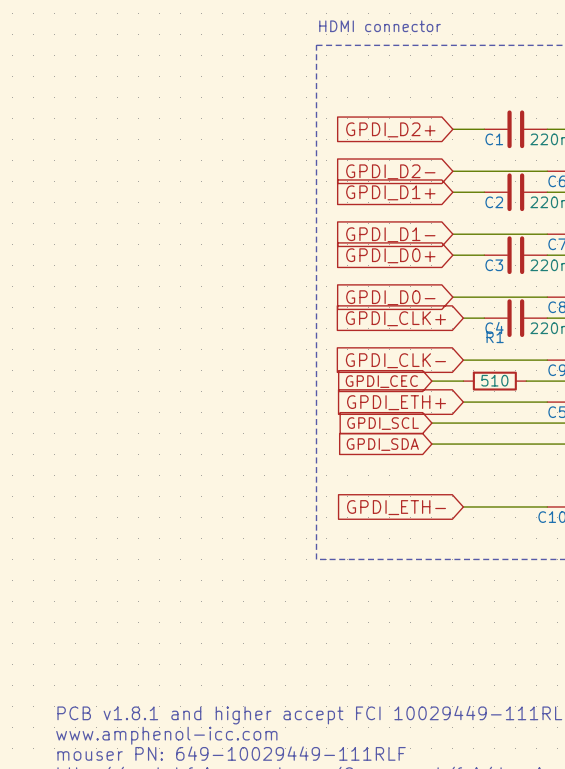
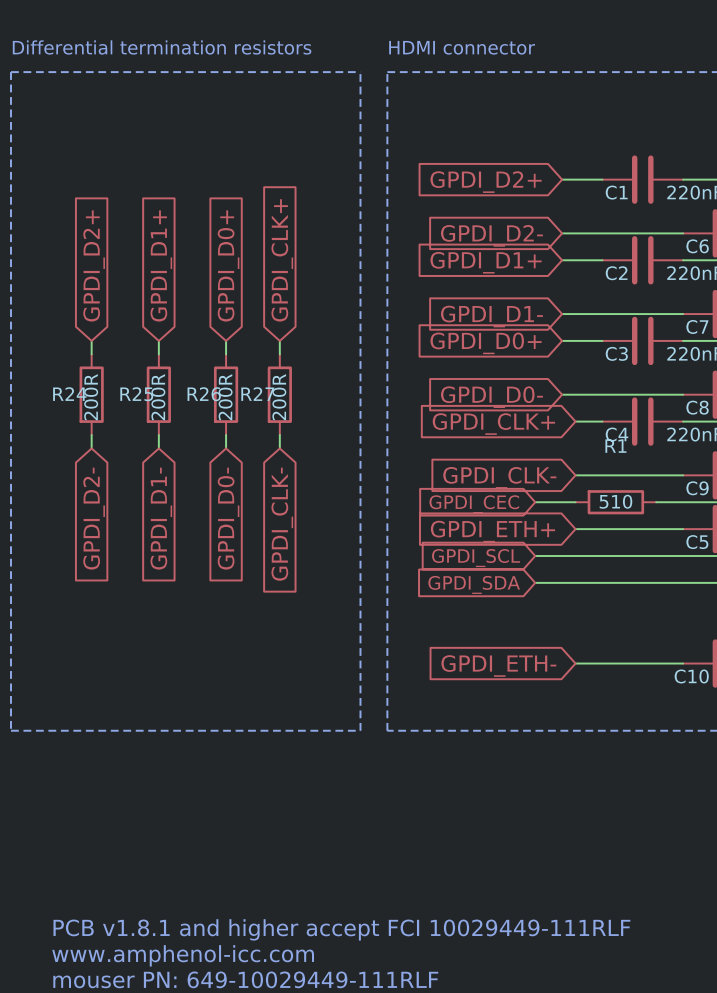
text: none -> Differential termination resistors (162, 47)
line: none -> (11, 72) (11, 730) (360, 730) (360, 72) (11, 72)
global label: none -> GPDI_CLK+ (282, 260)
global label: none -> GPDI_D2+ (94, 265)
global label: none -> GPDI_D1+ (161, 265)
global label: none -> GPDI_D0+ (228, 265)
wire: none -> (91, 340) (91, 354)
wire: none -> (158, 340) (158, 354)
wire: none -> (226, 340) (226, 354)
wire: none -> (279, 340) (279, 354)
R24: none -> 200R (91, 394)
R25: none -> 200R (158, 394)
R26: none -> 200R (226, 394)
R27: none -> 200R (279, 394)
wire: none -> (91, 435) (91, 448)
wire: none -> (158, 435) (158, 448)
wire: none -> (226, 435) (226, 448)
wire: none -> (279, 435) (279, 448)
global label: none -> GPDI_D2- (94, 518)
global label: none -> GPDI_D1- (161, 518)
global label: none -> GPDI_D0- (228, 518)
global label: none -> GPDI_CLK- (282, 524)

